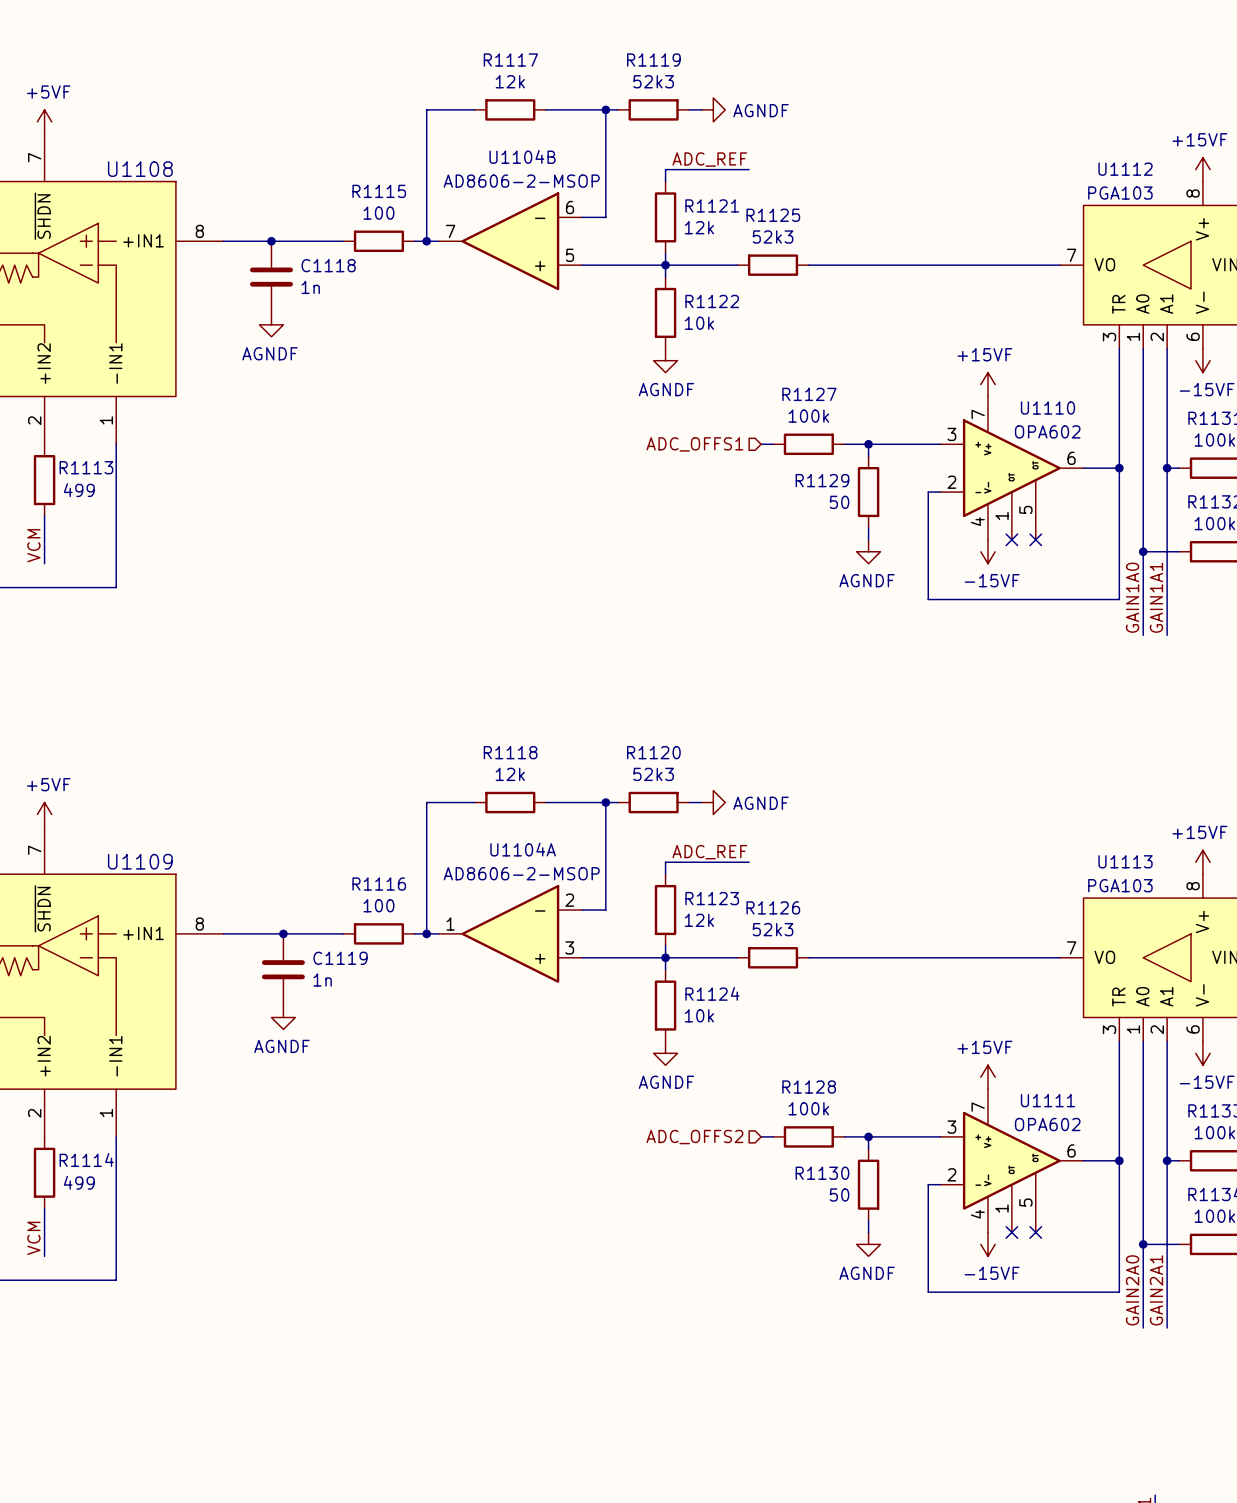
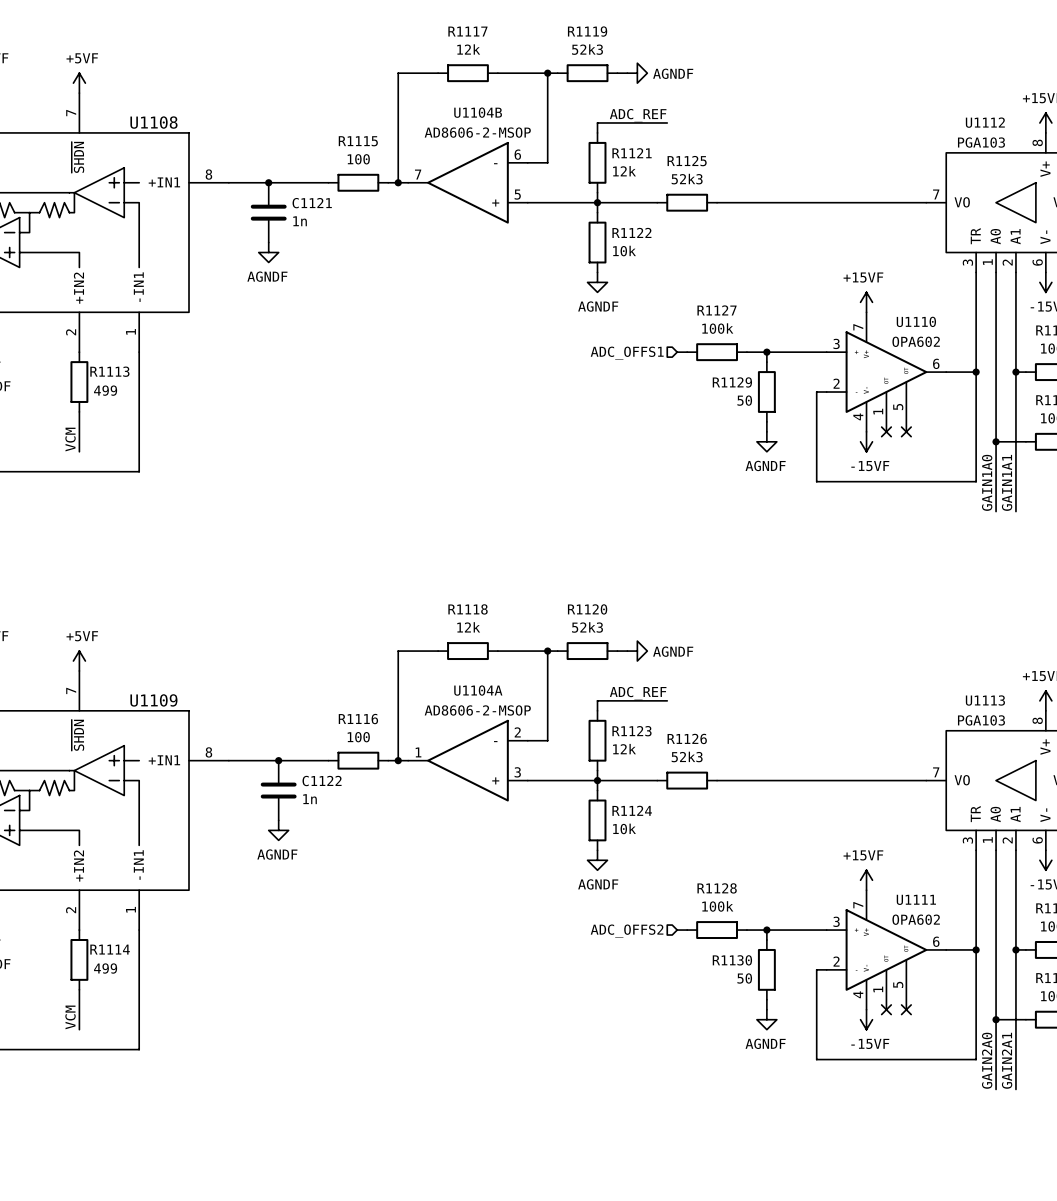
C1118 name: C1118 (328, 265) -> C1121 (312, 203)
C1119 name: C1119 (340, 958) -> C1122 (322, 781)

